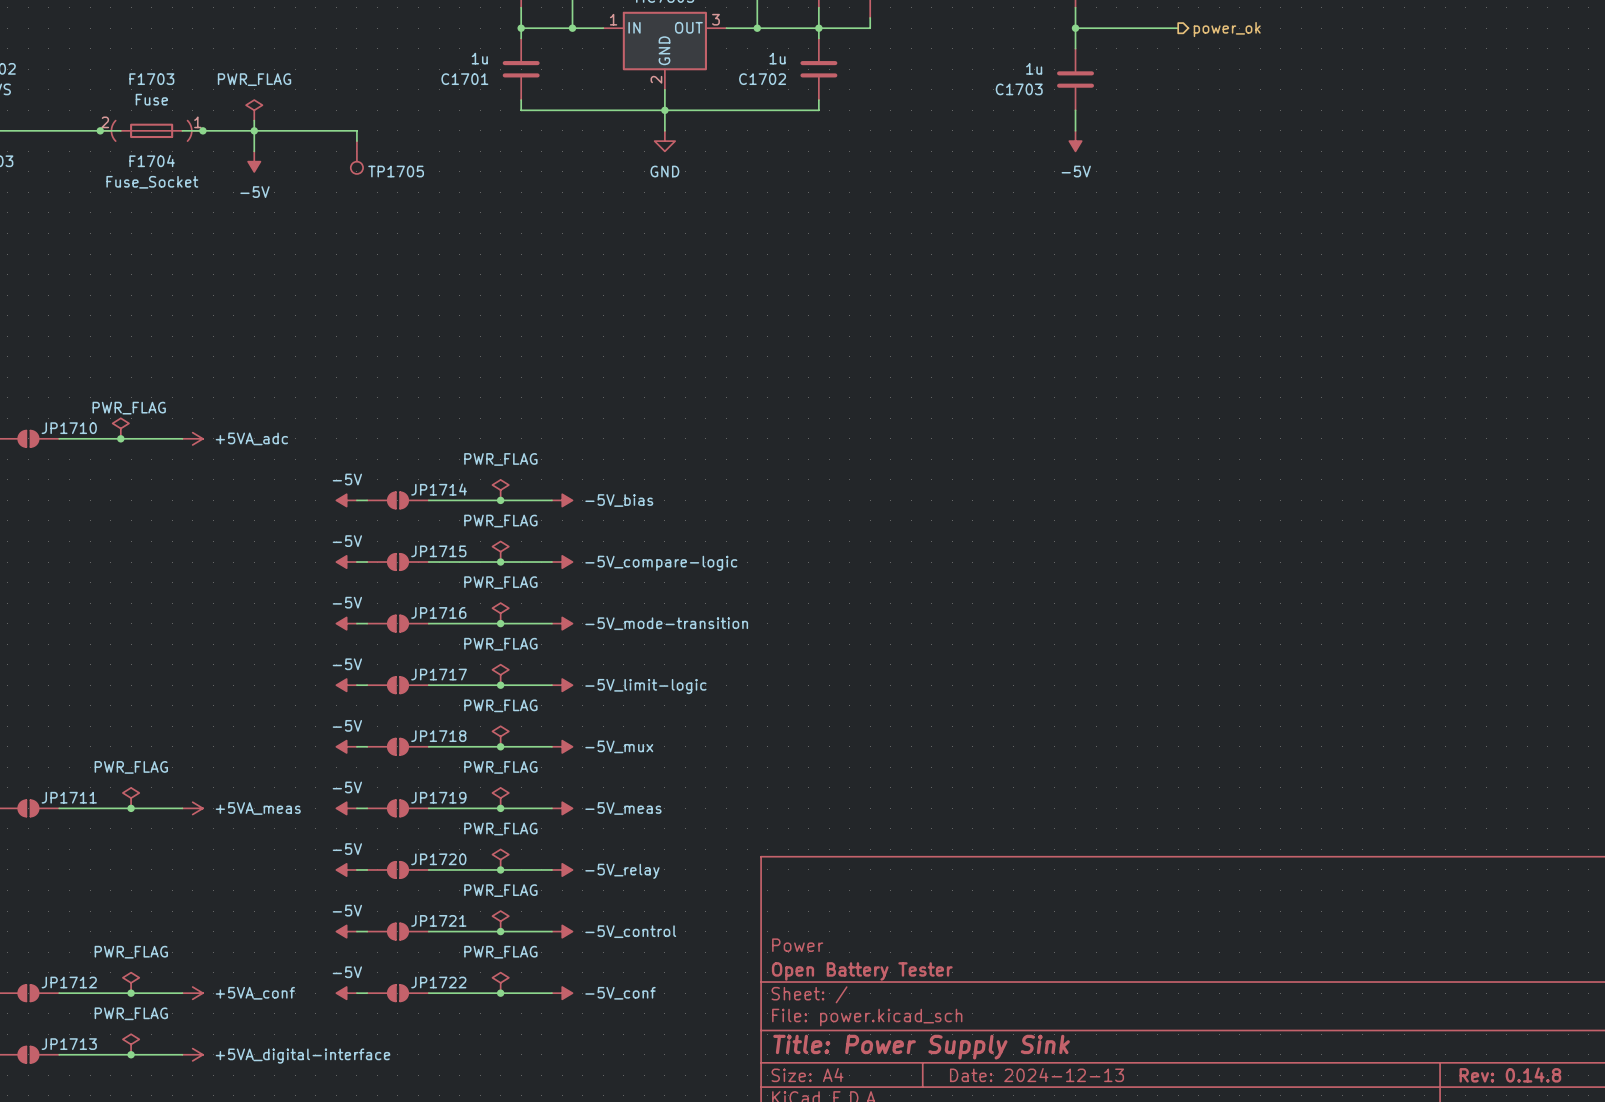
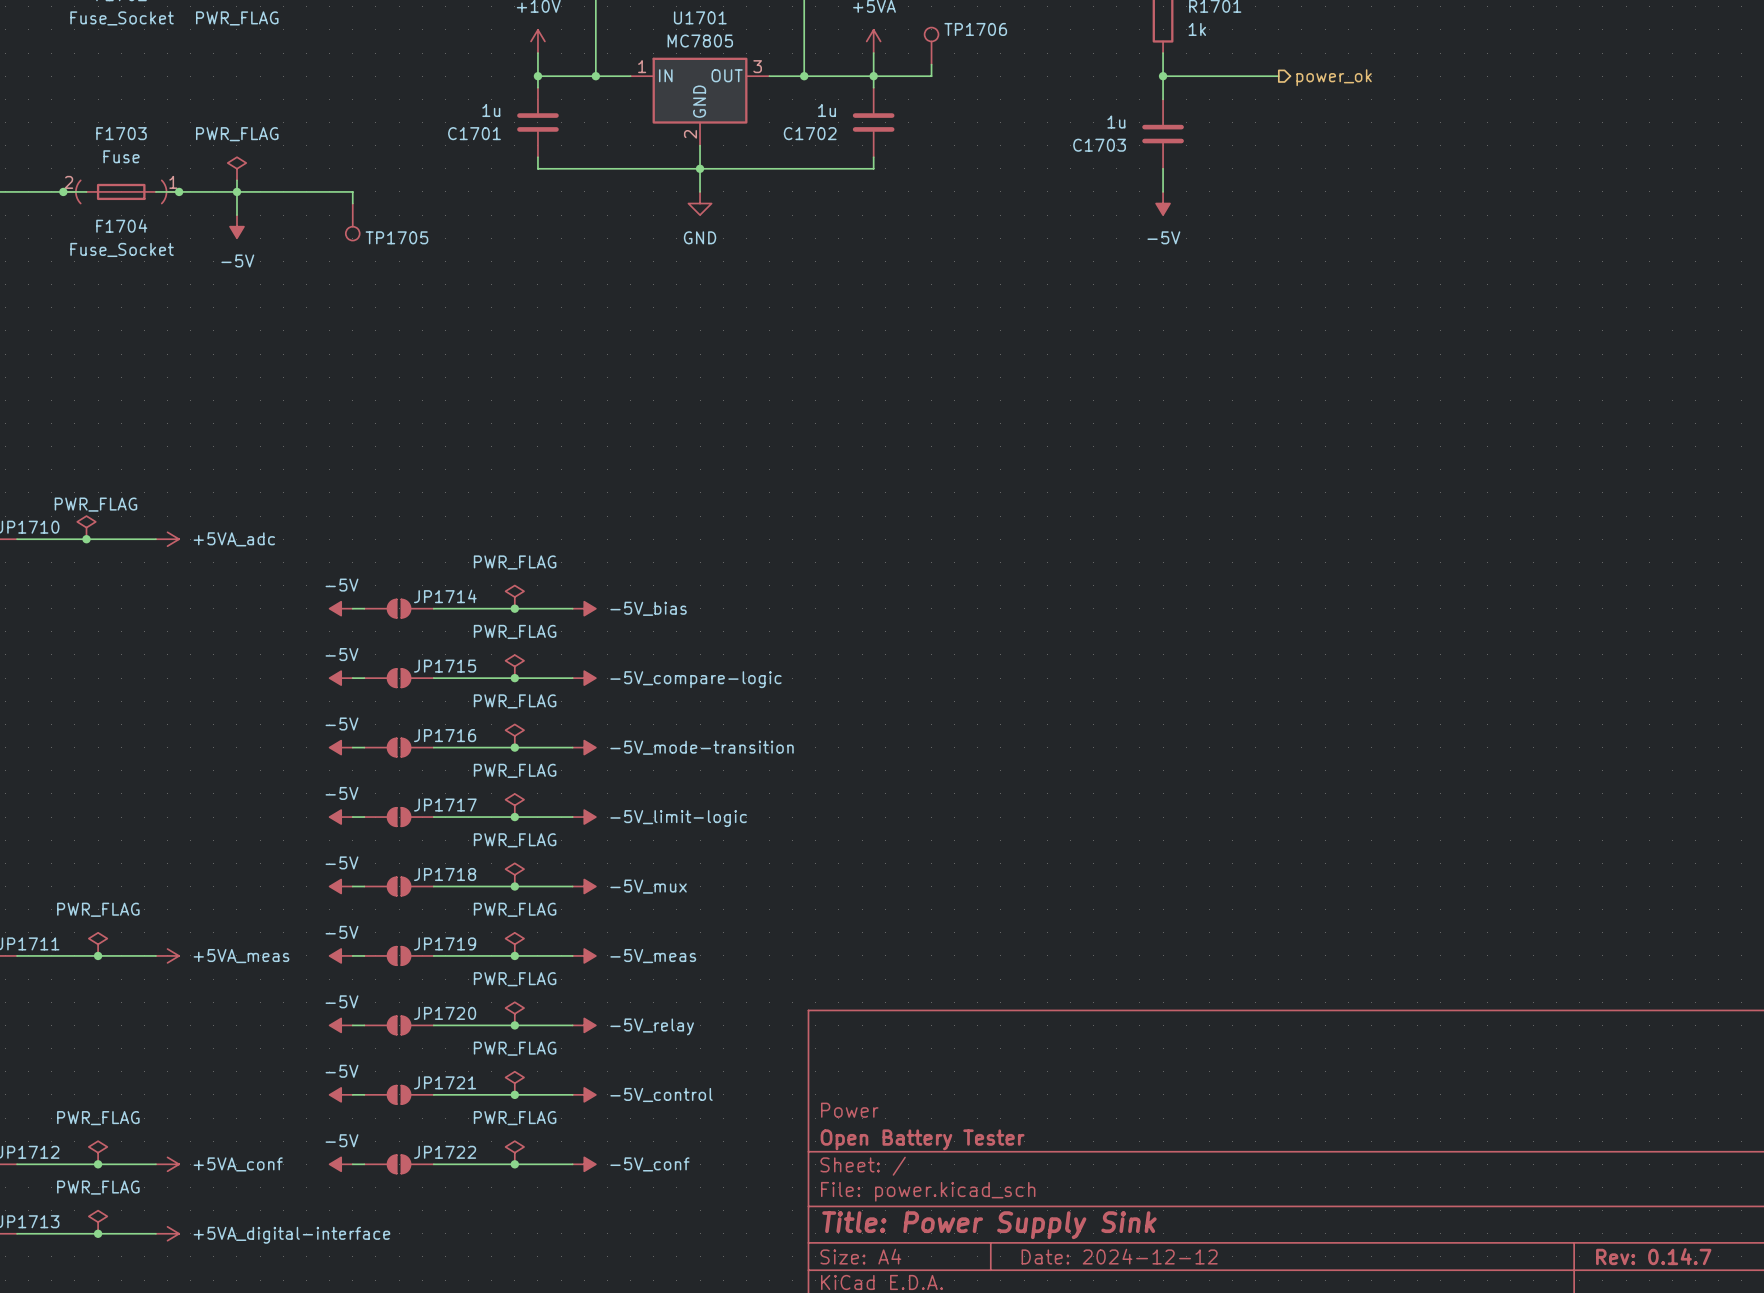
title block: Date: 2024-12-13 (1037, 1075) -> Date: 2024-12-12 (1119, 1256)
title block: Rev: 0.14.8 (1510, 1075) -> Rev: 0.14.7 (1653, 1256)

